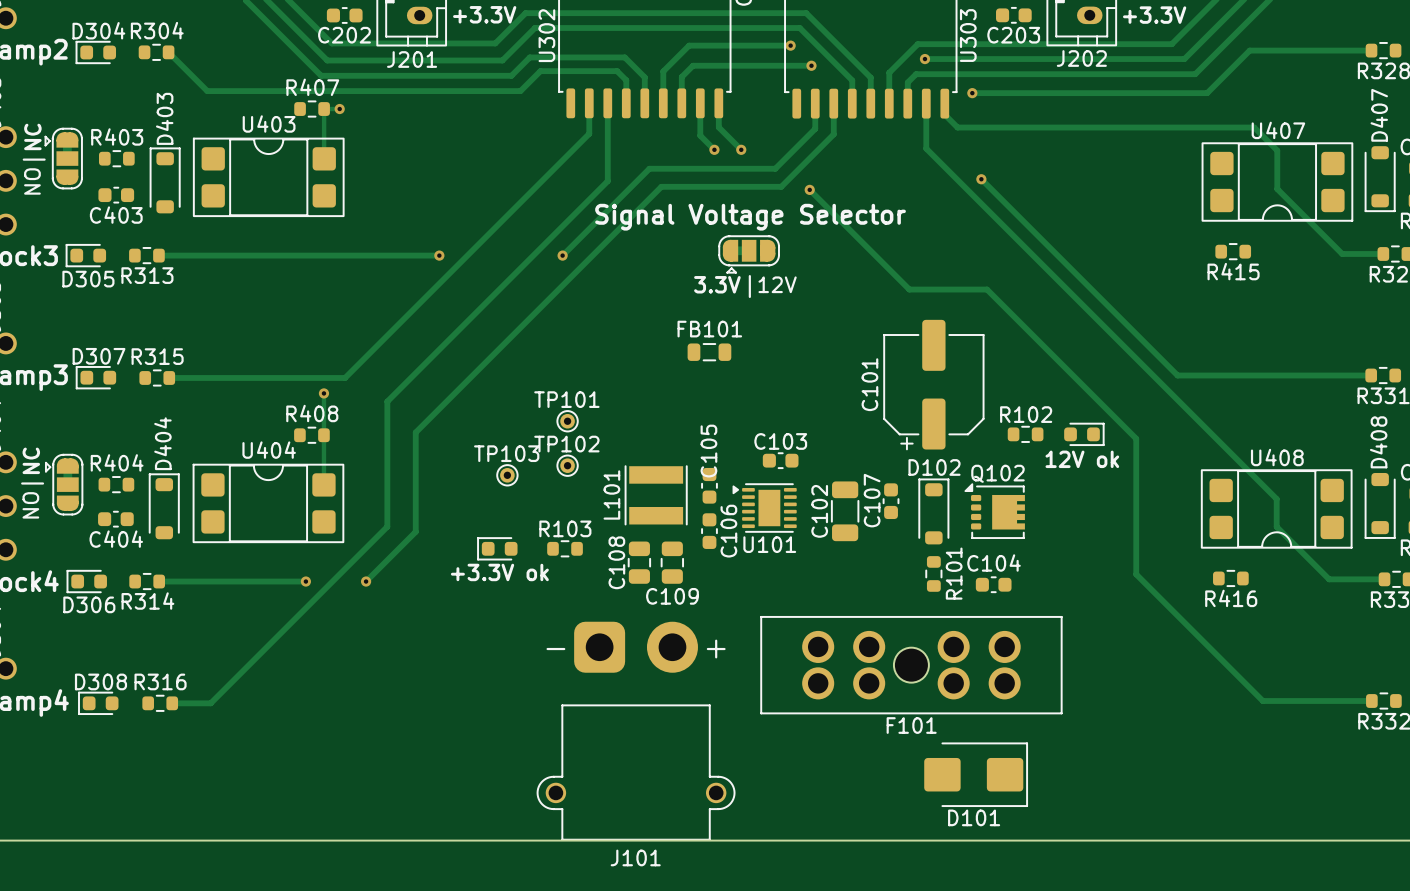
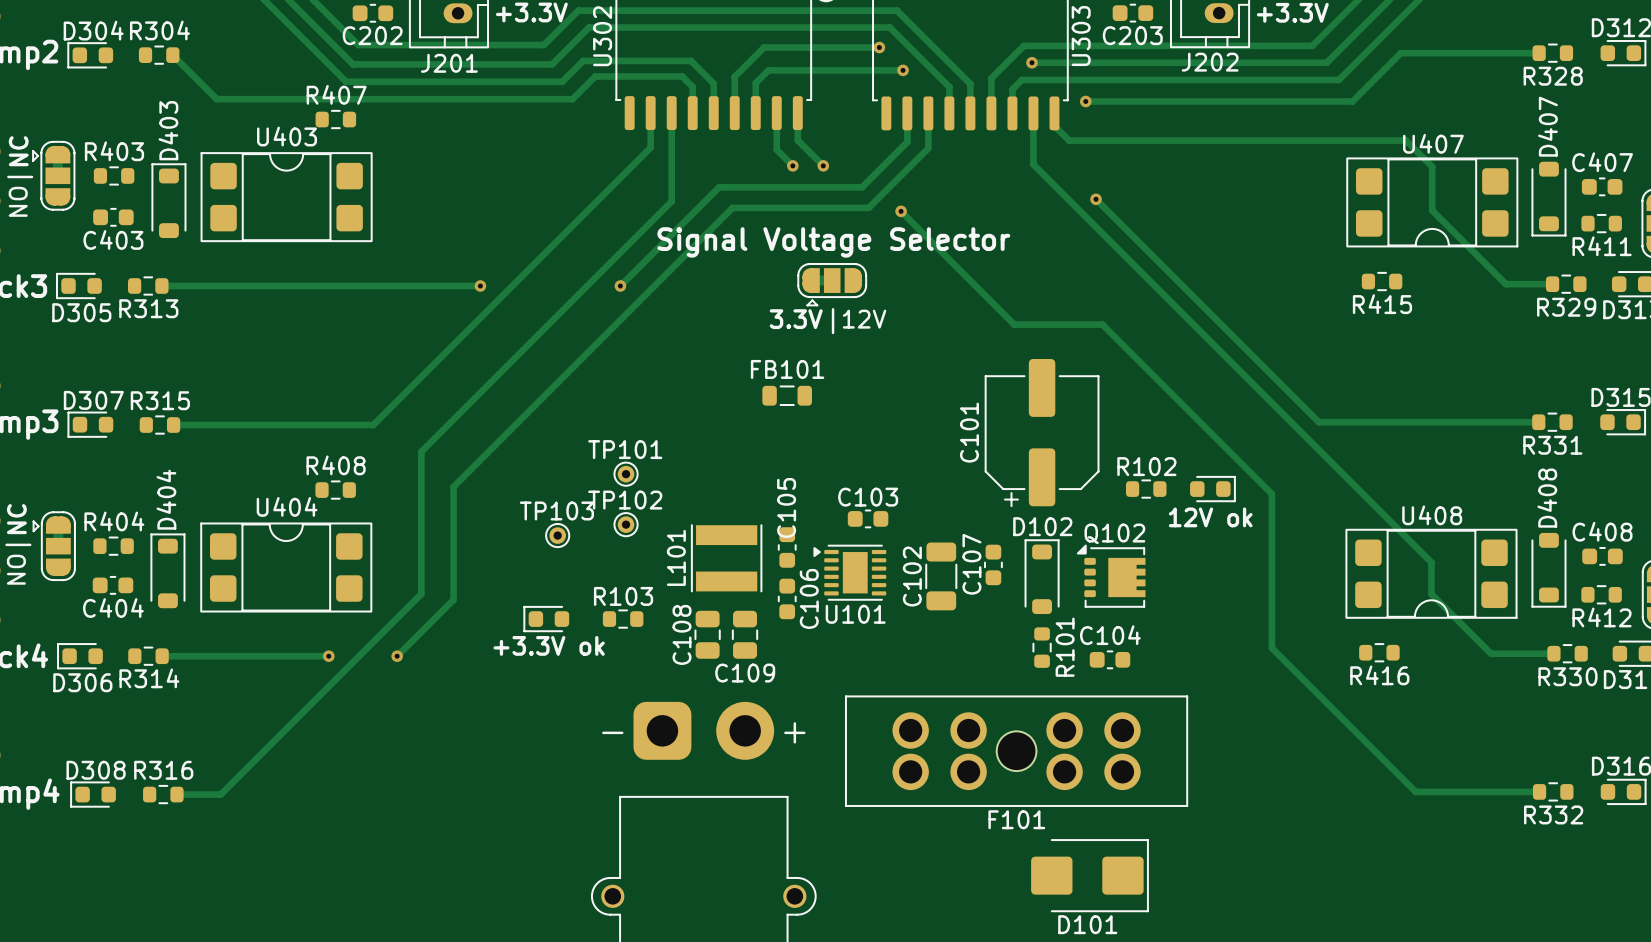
track: (339, 109) (324, 109) (324, 158) -> none
via: (339, 109) -> none
track: (323, 393) (323, 484) -> none
via: (323, 393) -> none

